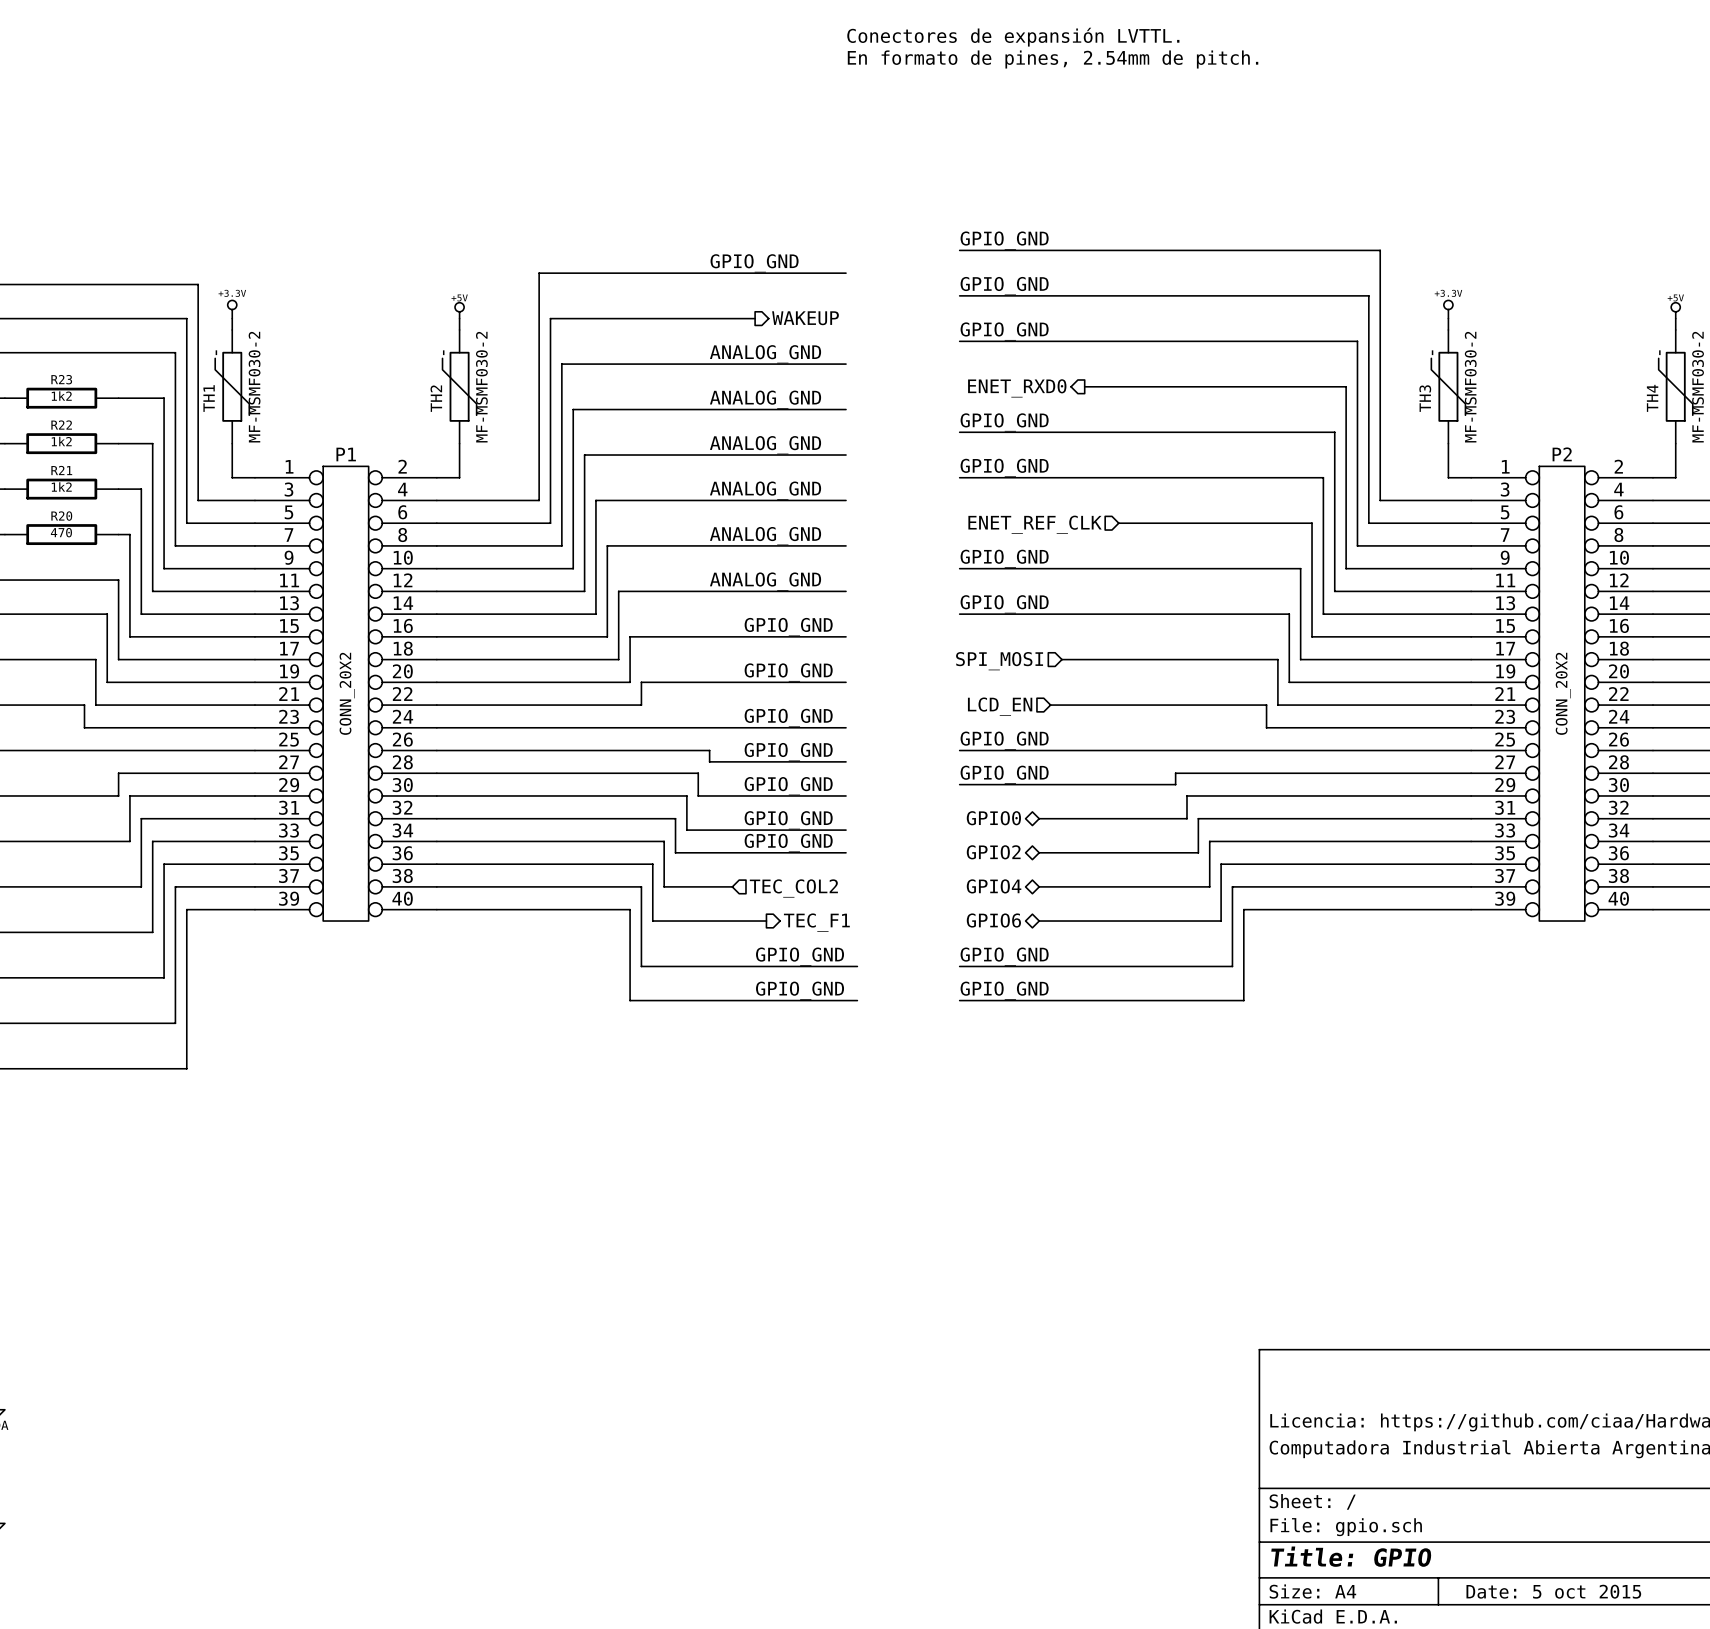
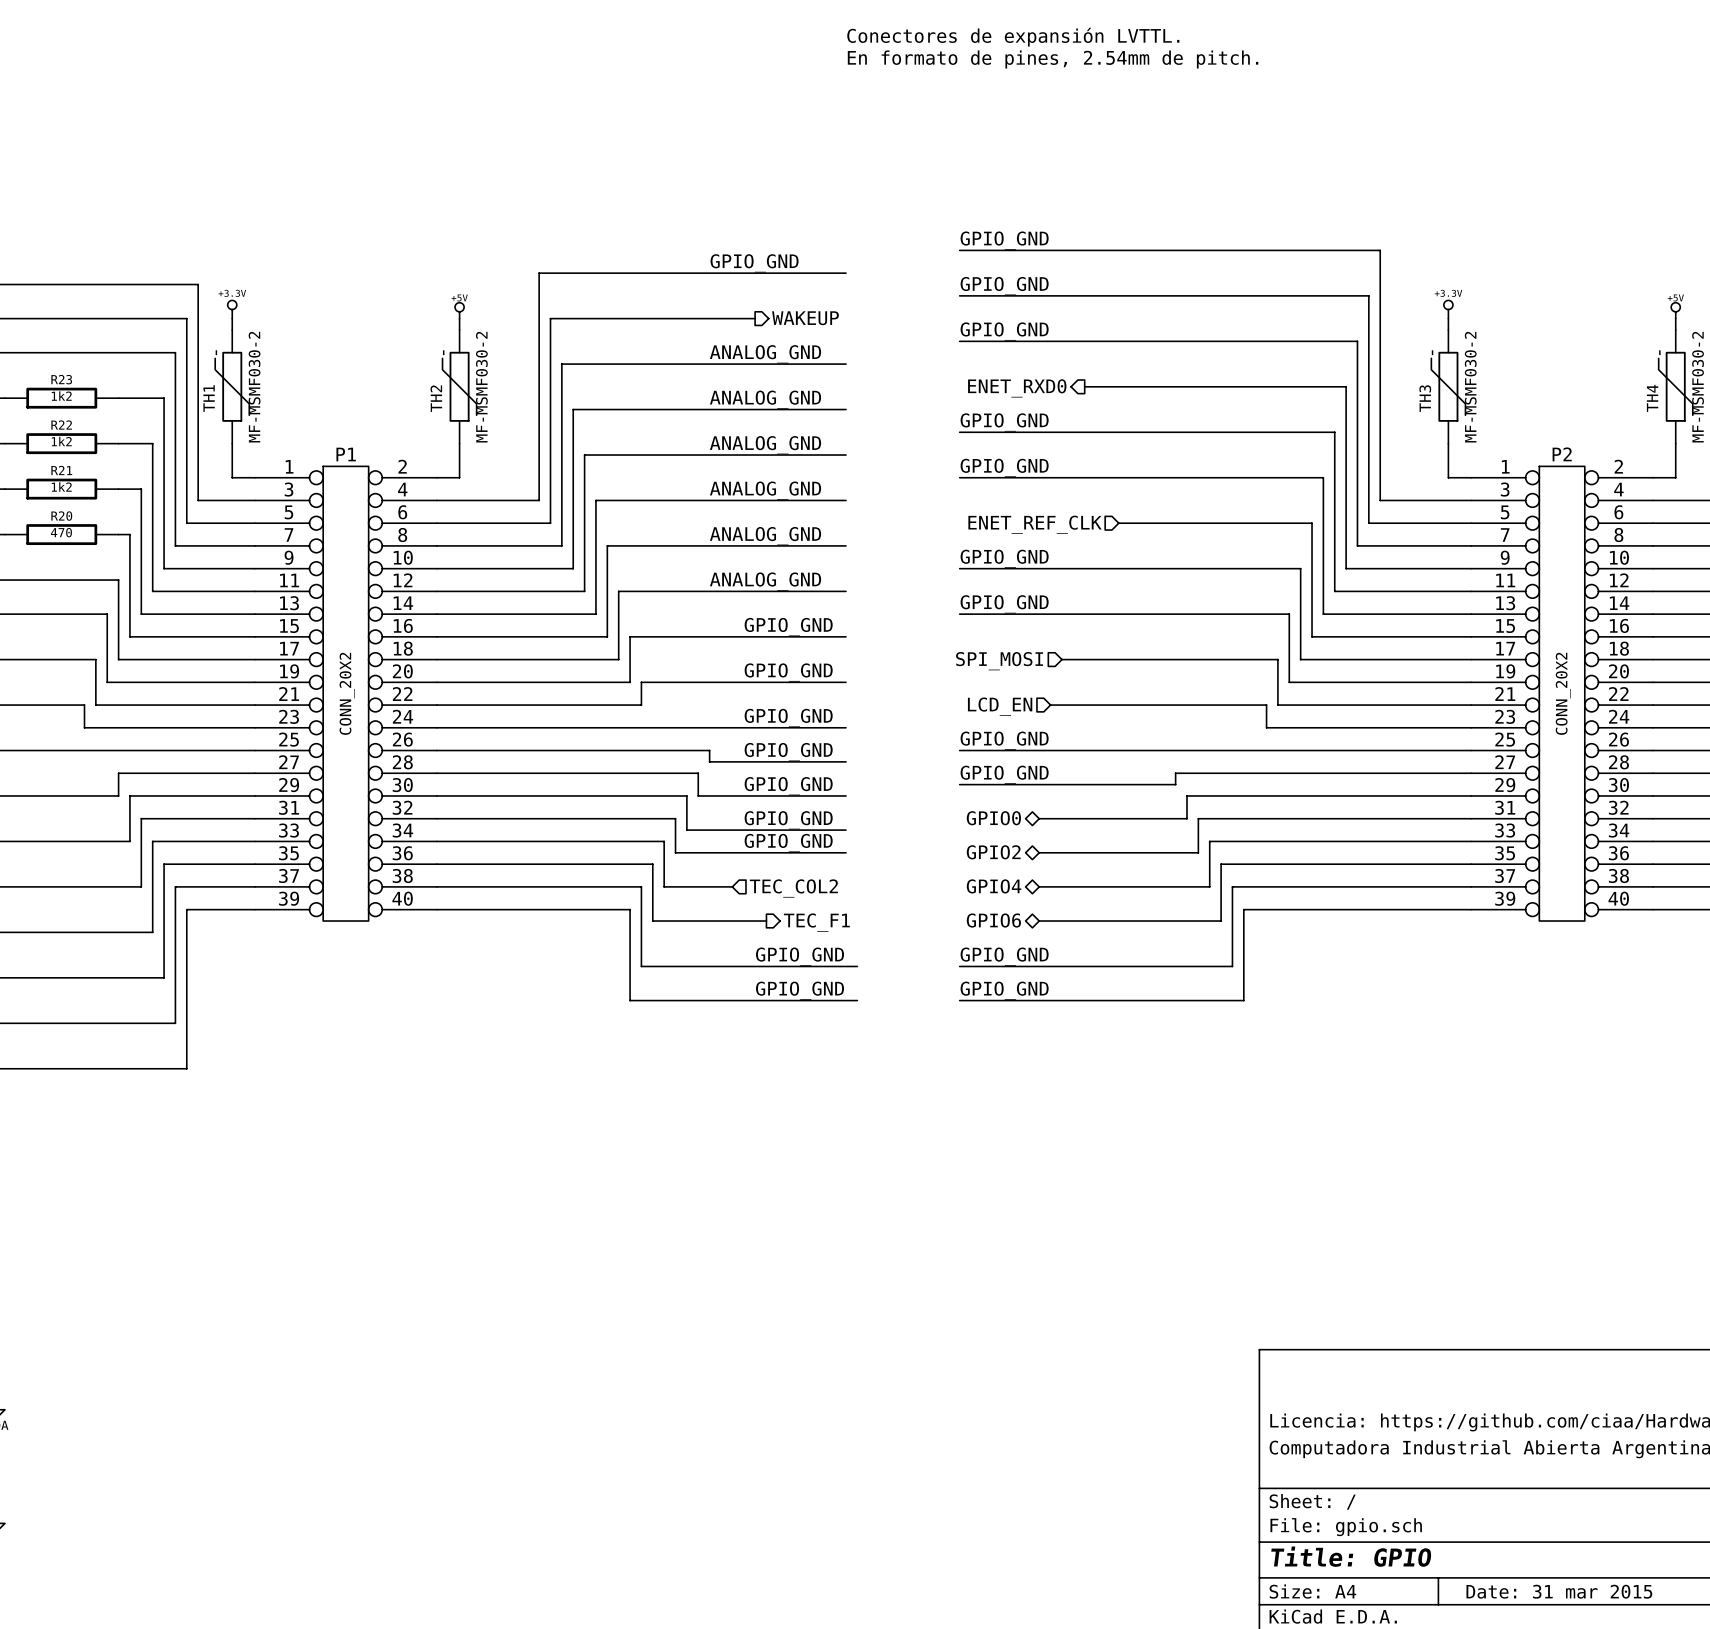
title block: Date: 5 oct 2015 (1553, 1591) -> Date: 31 mar 2015 (1559, 1591)

